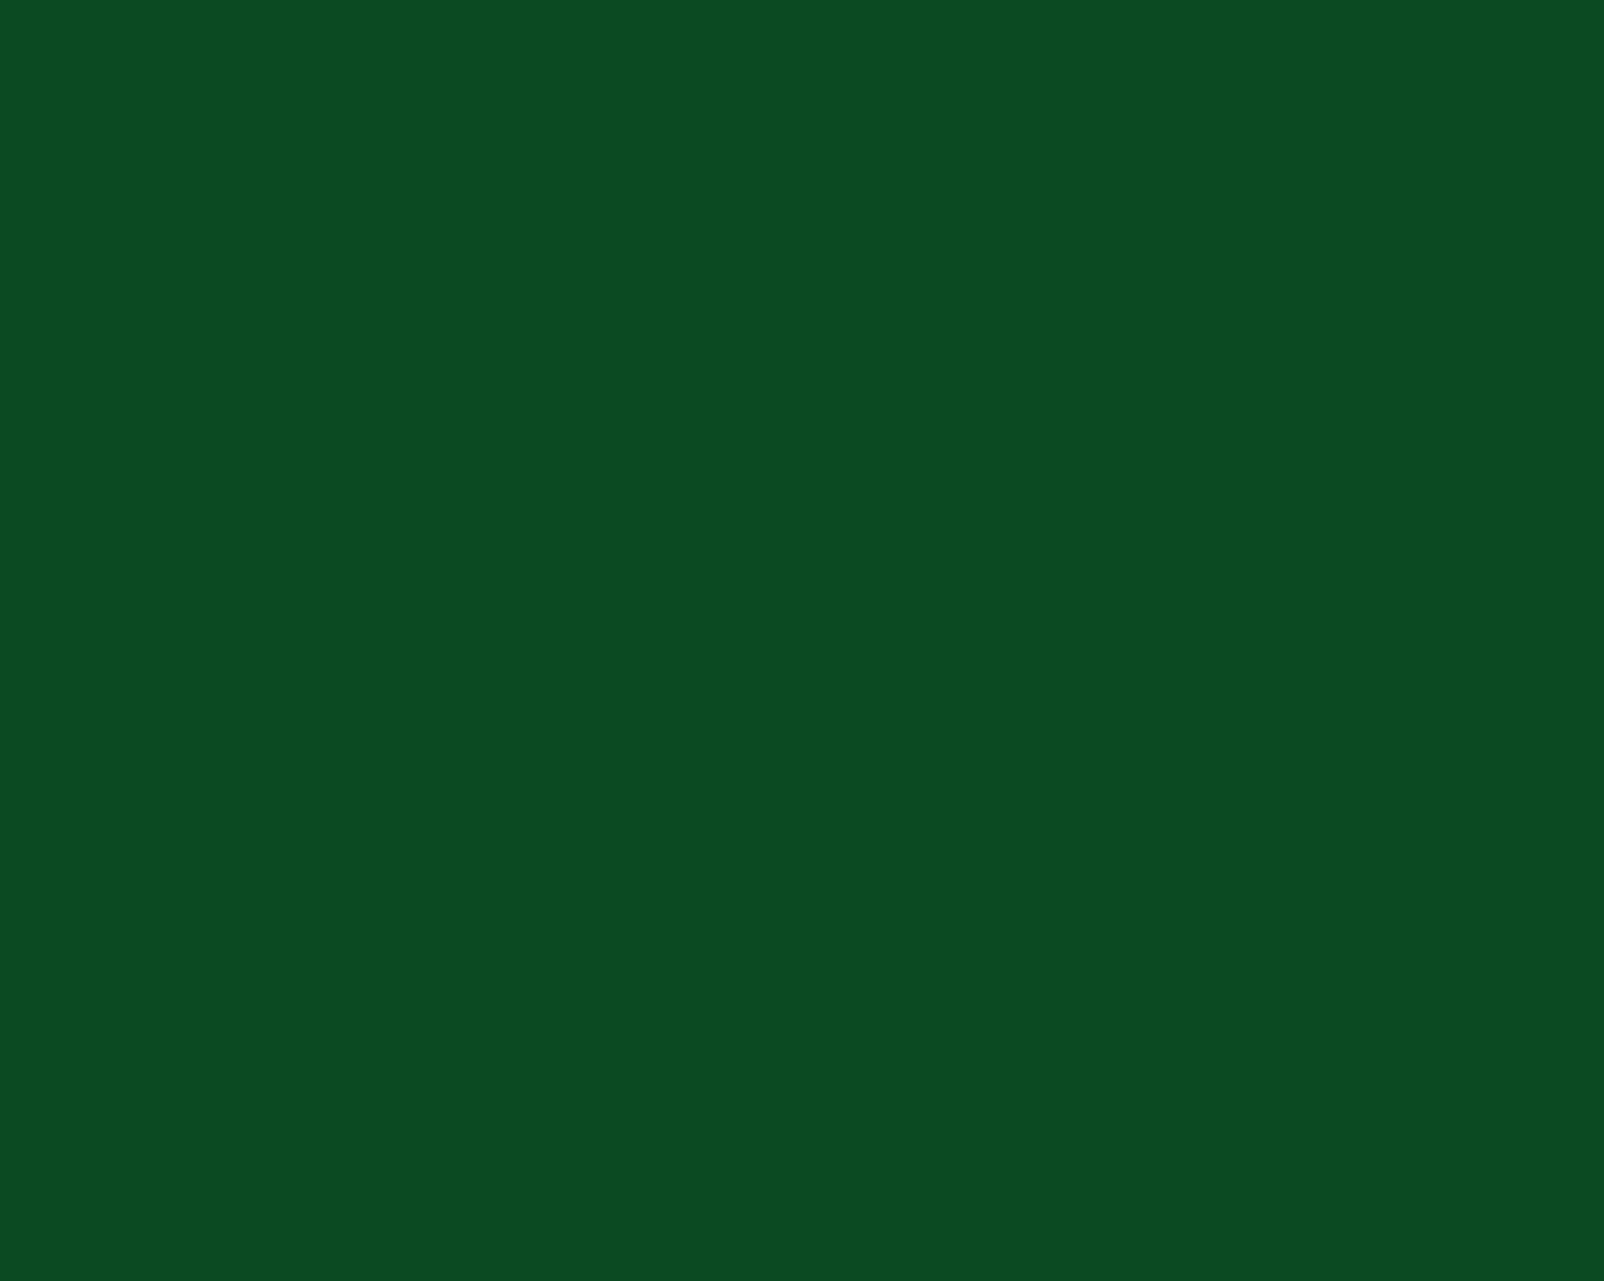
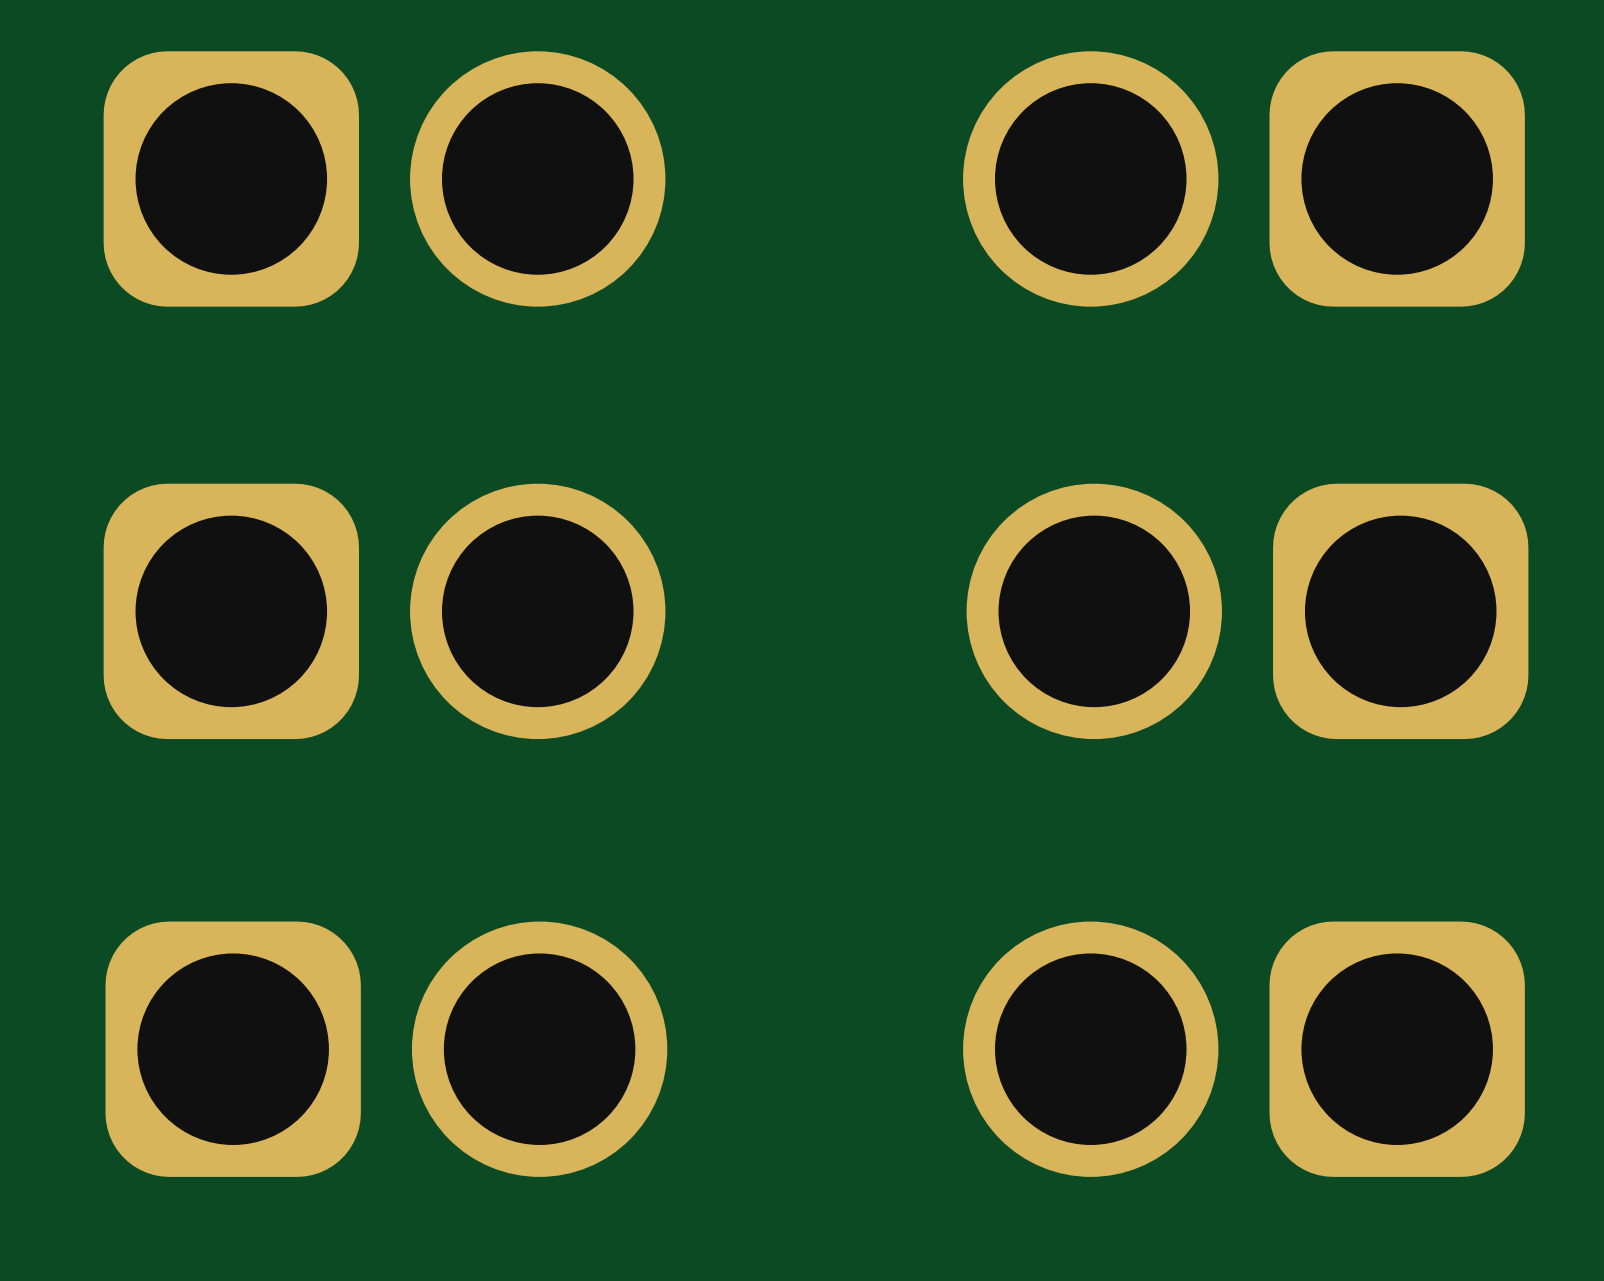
part: none -> (384, 178)
part: none -> (1243, 178)
part: none -> (384, 611)
part: none -> (1247, 611)
part: none -> (386, 1049)
part: none -> (1243, 1049)

